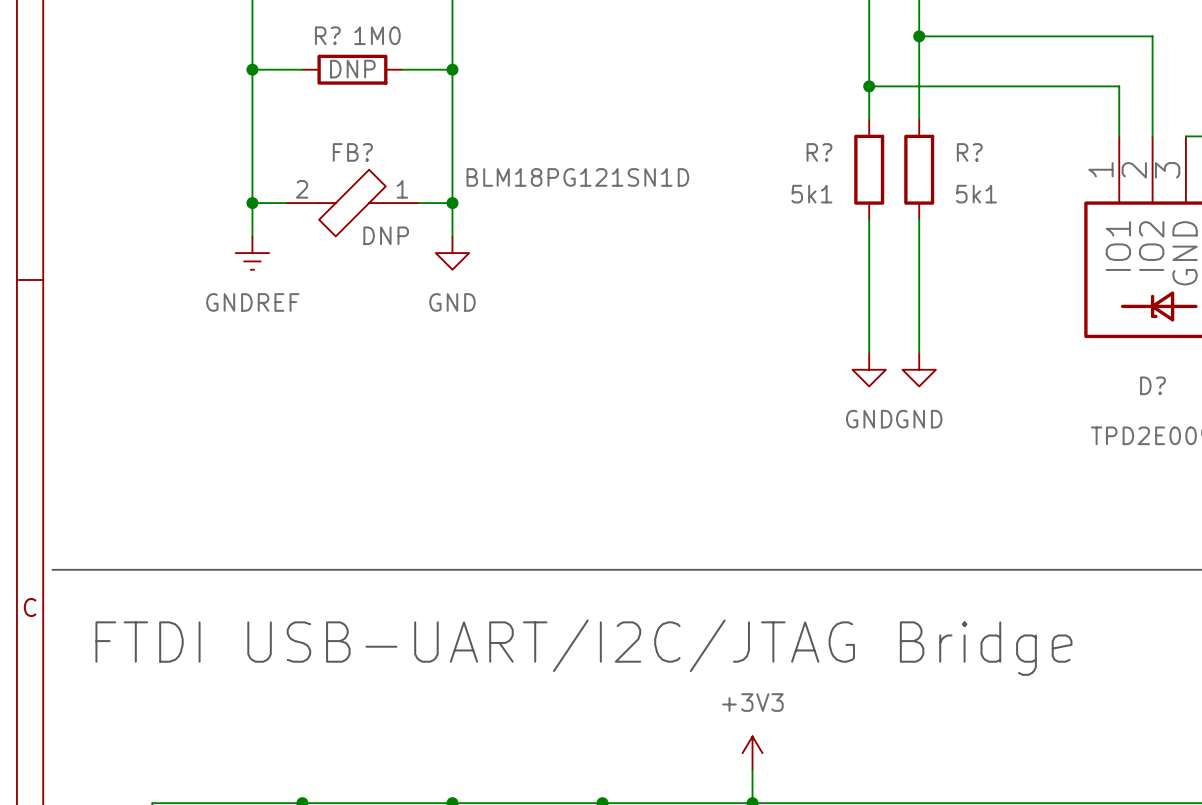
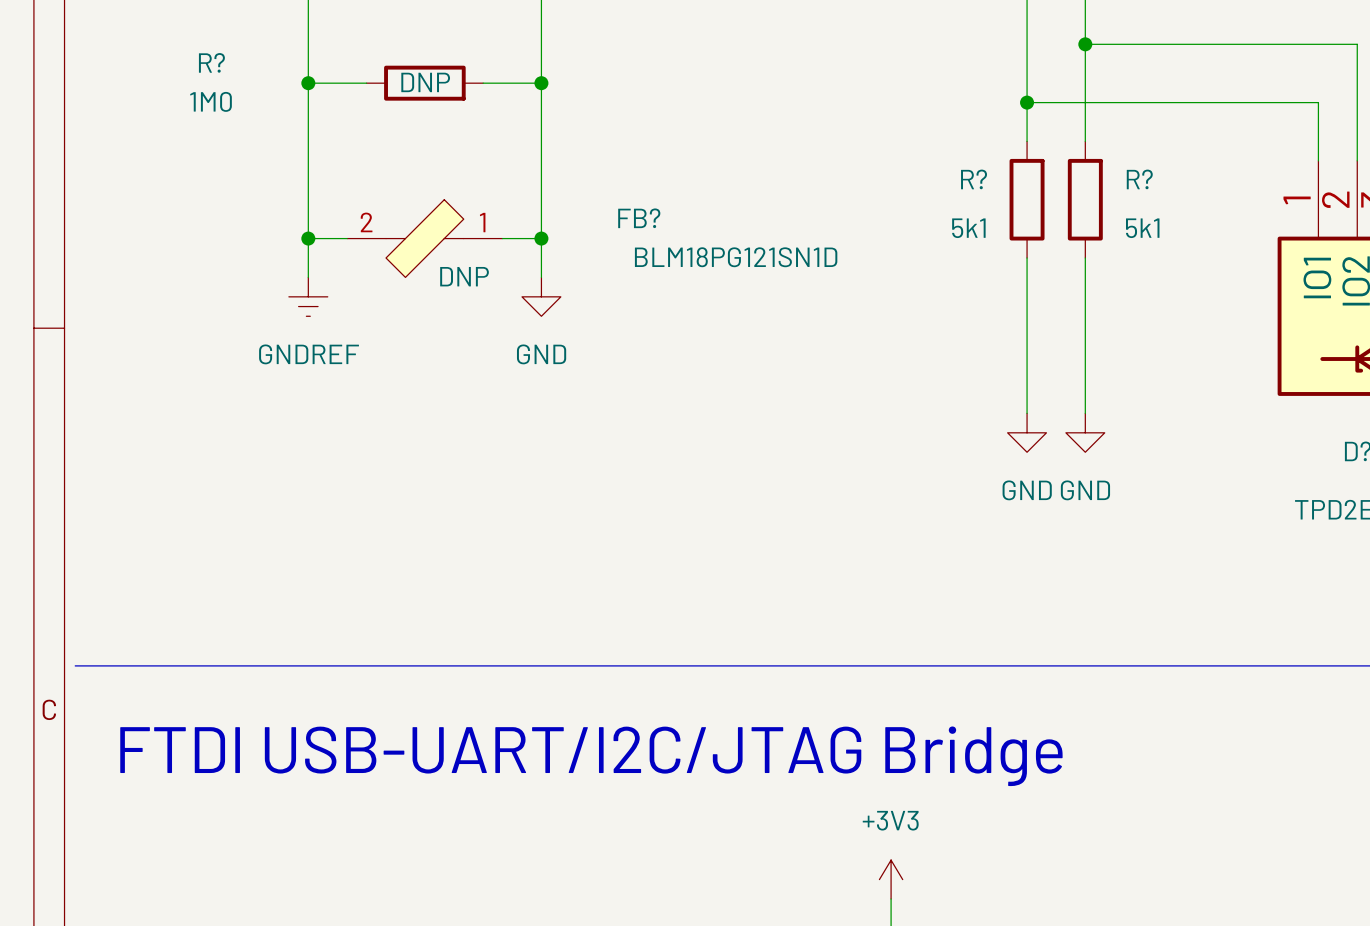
R? name position: R? (327, 35) -> R? (211, 62)
R? text position: 1M0 (377, 35) -> 1M0 (211, 101)
FB? name position: FB? (352, 152) -> FB? (639, 218)
FB? value position: BLM18PG121SN1D (577, 177) -> BLM18PG121SN1D (736, 257)

